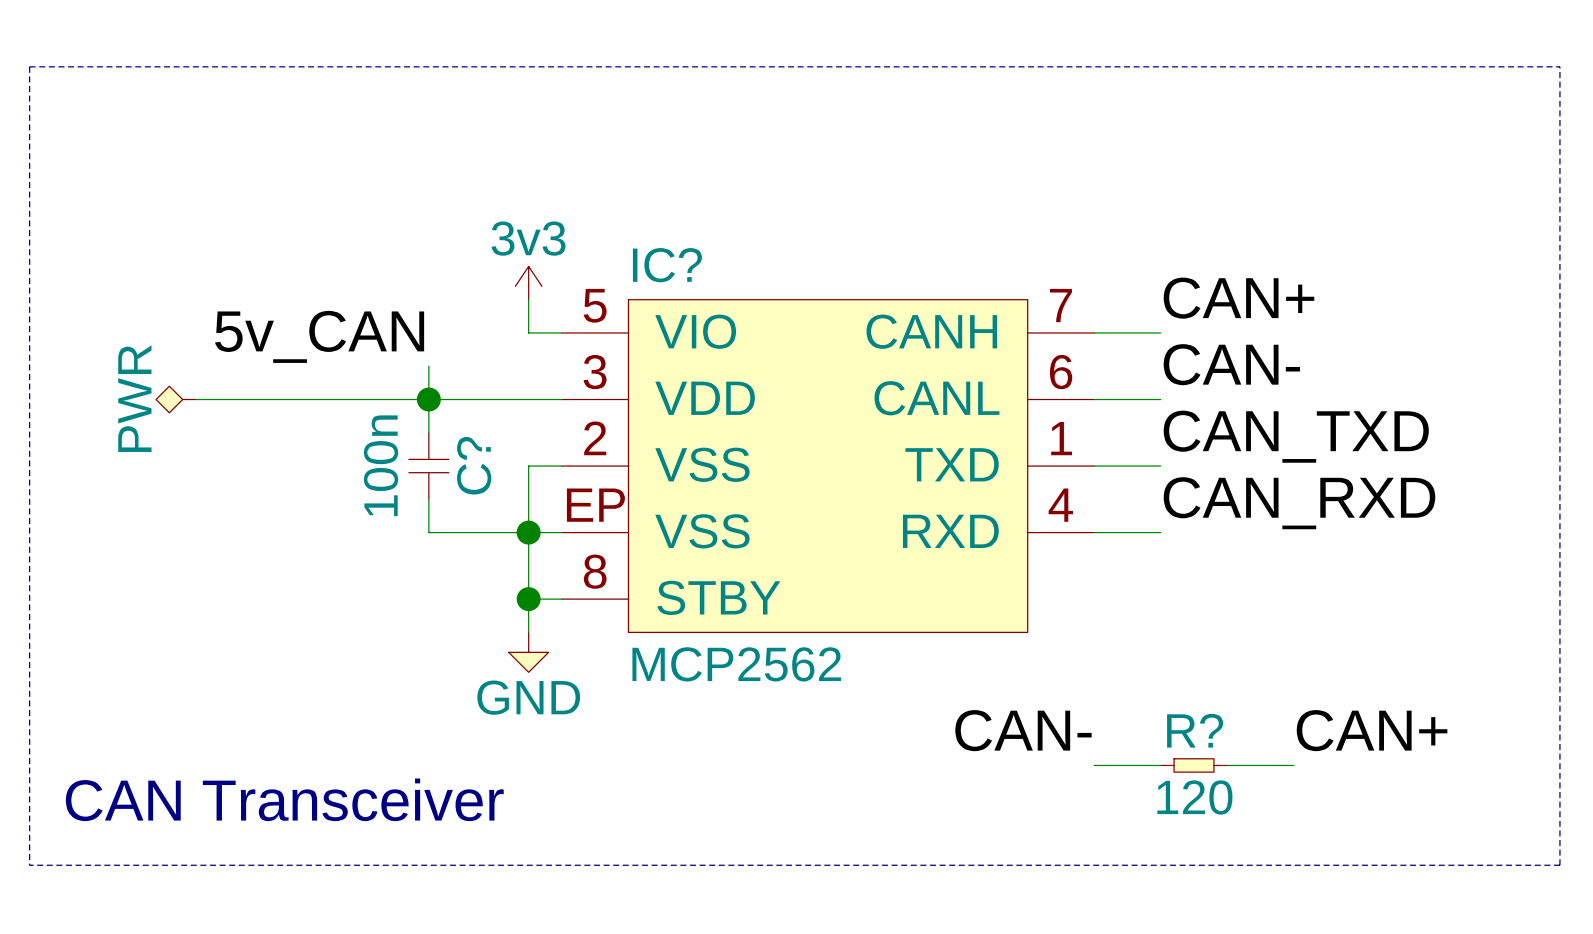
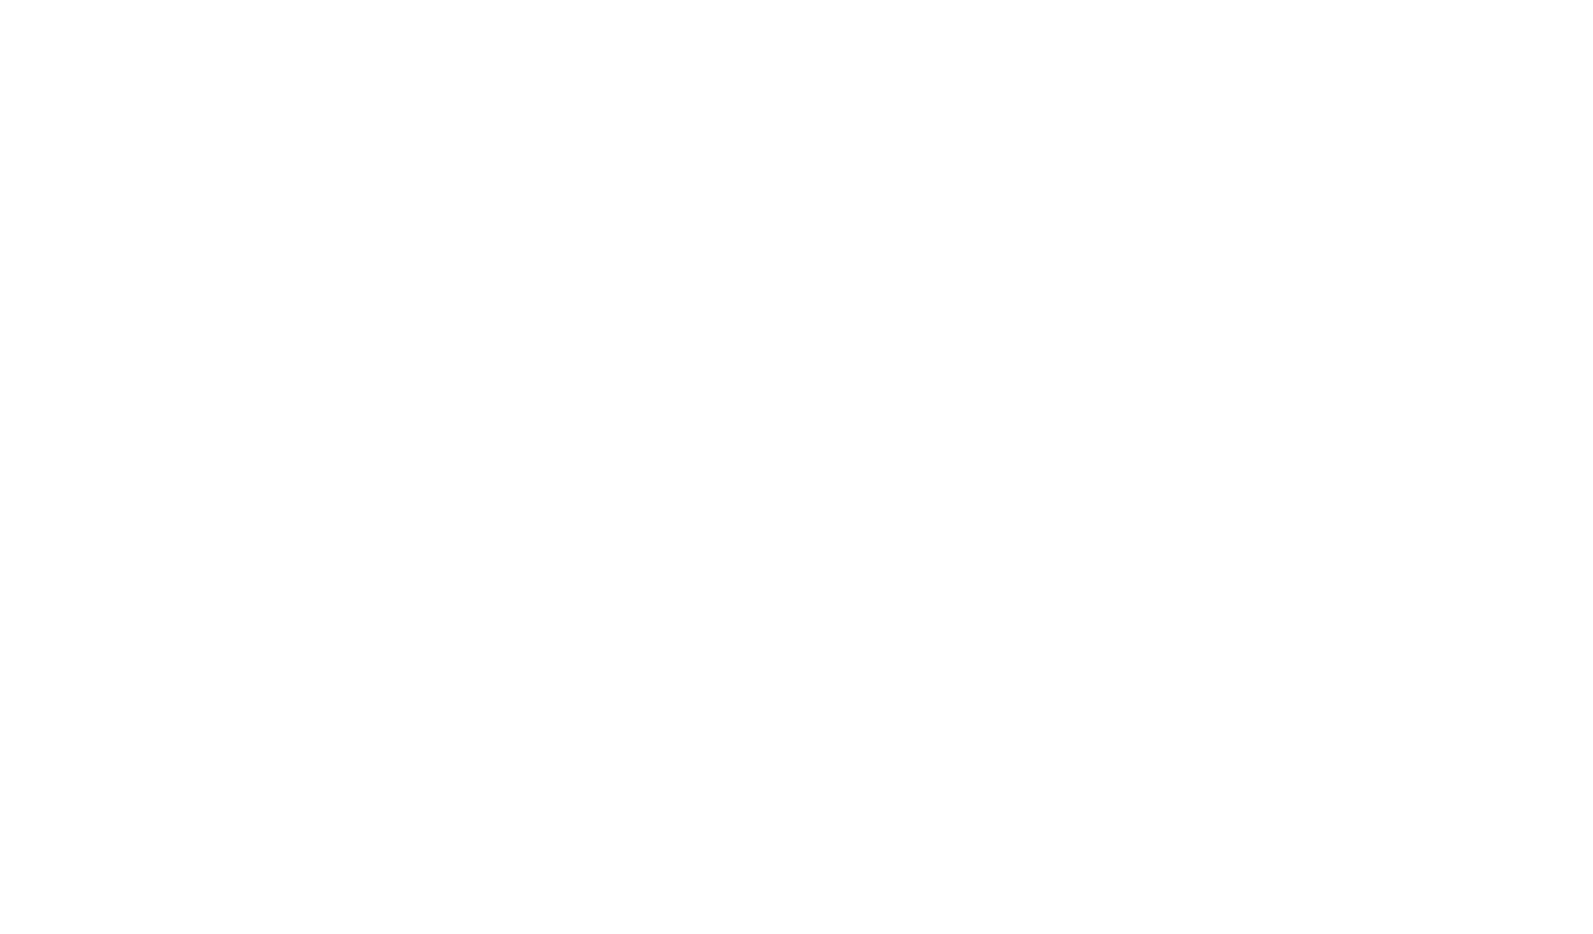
line: (29, 66) (29, 865) (1559, 865) (1559, 66) (29, 66) -> none
power symbol: 3v3 (528, 283) -> none
label: CAN+ (1238, 298) -> none
wire: (528, 299) (528, 332) (561, 332) -> none
wire: (1094, 332) (1160, 332) -> none
label: 5v_CAN (319, 336) -> none
label: CAN- (1231, 364) -> none
wire: (428, 366) (428, 432) -> none
power symbol: PWR (176, 399) -> none
wire: (195, 399) (561, 399) -> none
junction: (428, 399) -> none
wire: (1094, 399) (1160, 399) -> none
label: CAN_TXD (1296, 436) -> none
C?: 100n (428, 466) -> none
wire: (561, 466) (528, 466) (528, 632) -> none
IC?: MCP2562 (828, 466) -> none
wire: (1094, 466) (1160, 466) -> none
wire: (428, 499) (428, 532) (561, 532) -> none
label: CAN_RXD (1299, 503) -> none
junction: (528, 532) -> none
wire: (1094, 532) (1160, 532) -> none
wire: (528, 599) (561, 599) -> none
junction: (528, 599) -> none
power symbol: GND (528, 652) -> none
label: CAN- (1023, 730) -> none
label: CAN+ (1372, 730) -> none
wire: (1094, 765) (1160, 765) -> none
R?: 120 (1194, 765) -> none
wire: (1227, 765) (1293, 765) -> none
text: CAN Transceiver (284, 799) -> none

